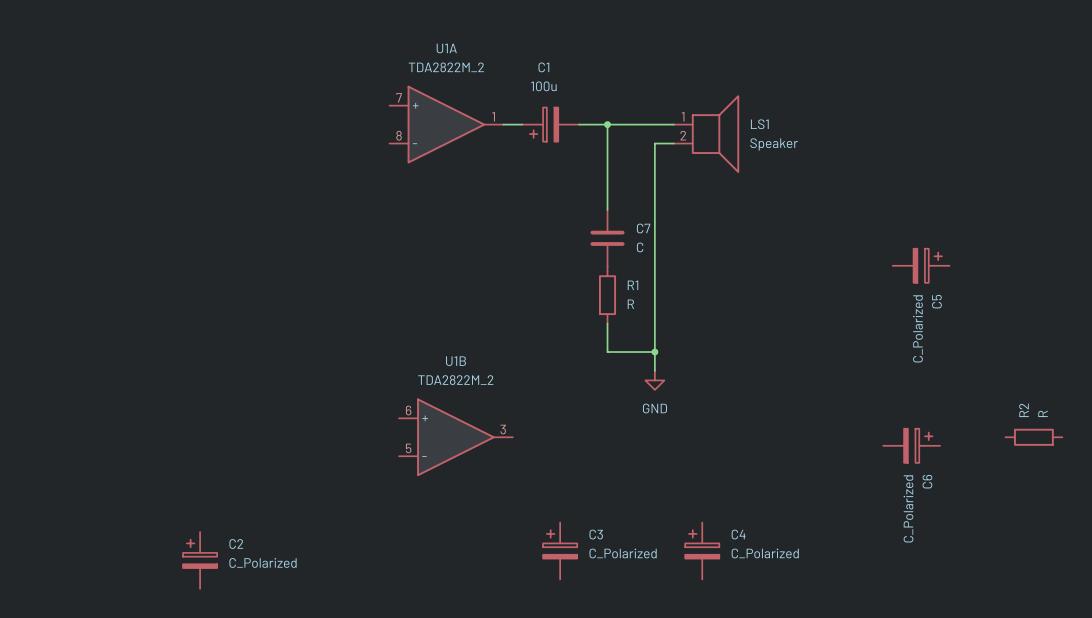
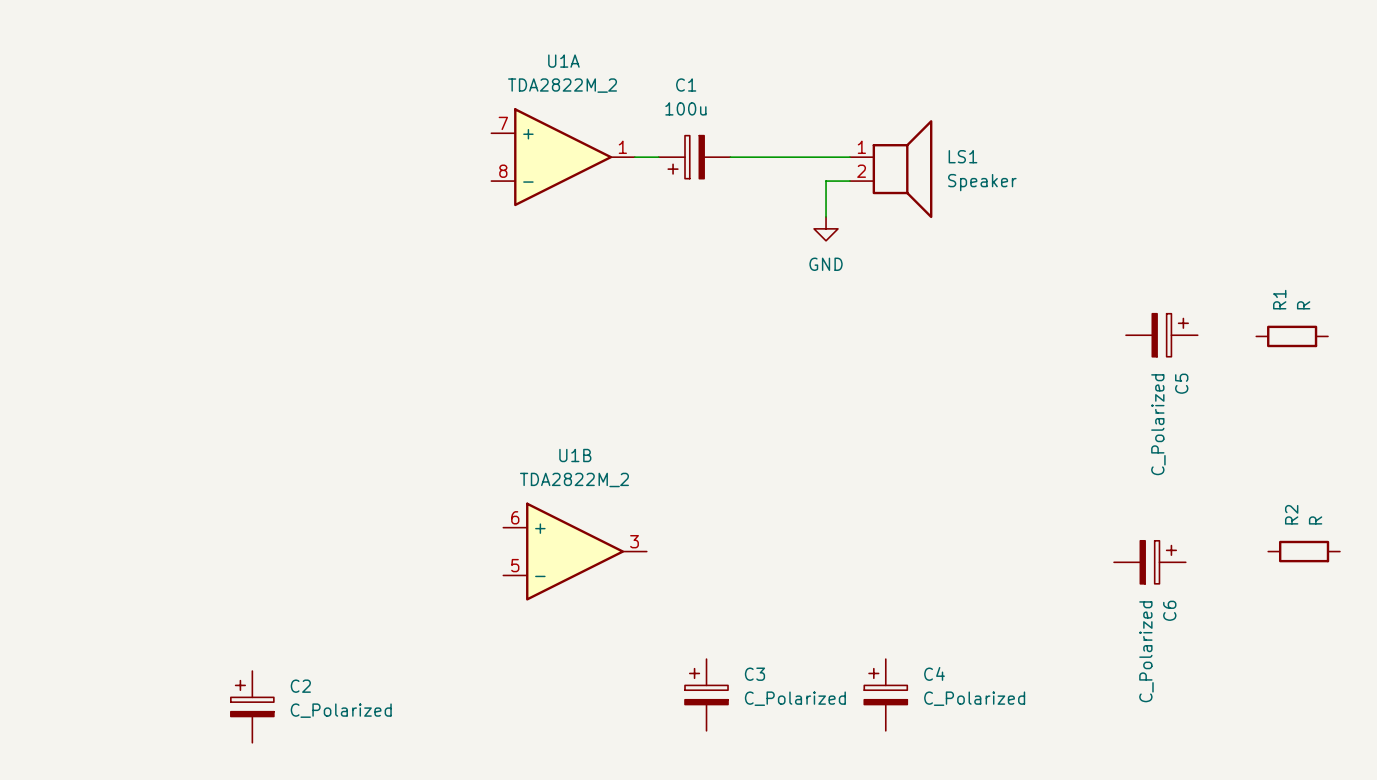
wire: (607, 124) (607, 209) -> none
junction: (607, 124) -> none
wire: (654, 171) (654, 370) -> none
power symbol: none -> GND (826, 228)
C7: C (607, 238) -> none
R1 name position: R1 (632, 285) -> R1 (1279, 299)
R1 rotation: 0° (607, 295) -> 90° clockwise (1292, 336)
R1 position: (607, 295) -> (1292, 336)
R1 value position: R (630, 304) -> R (1303, 305)
wire: (607, 323) (607, 352) (654, 352) -> none
junction: (654, 352) -> none
power symbol: GND (654, 380) -> none

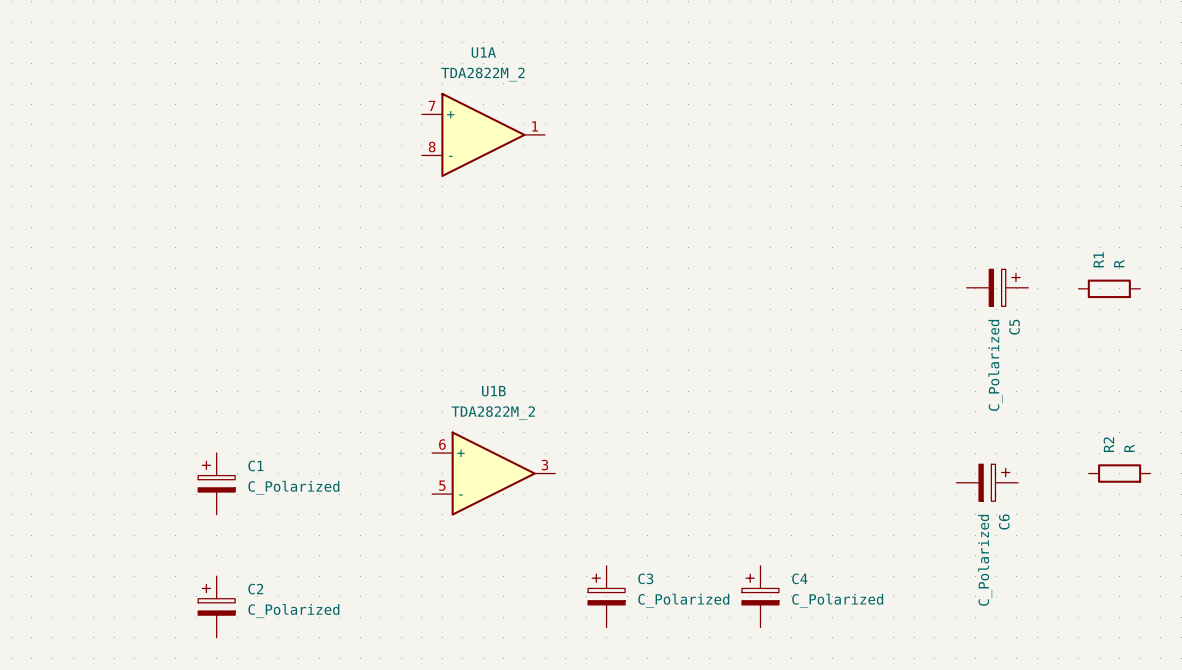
C1 name position: C1 (686, 85) -> C1 (255, 465)
C1 value: 100u (685, 108) -> C_Polarized (293, 487)
wire: (634, 157) (658, 157) -> none
C1 rotation: 0° (686, 157) -> 90° clockwise (216, 476)
C1 position: (694, 157) -> (216, 483)
wire: (730, 157) (849, 157) -> none
LS1: Speaker (891, 169) -> none
wire: (849, 181) (826, 181) (826, 216) -> none
power symbol: GND (826, 228) -> none

